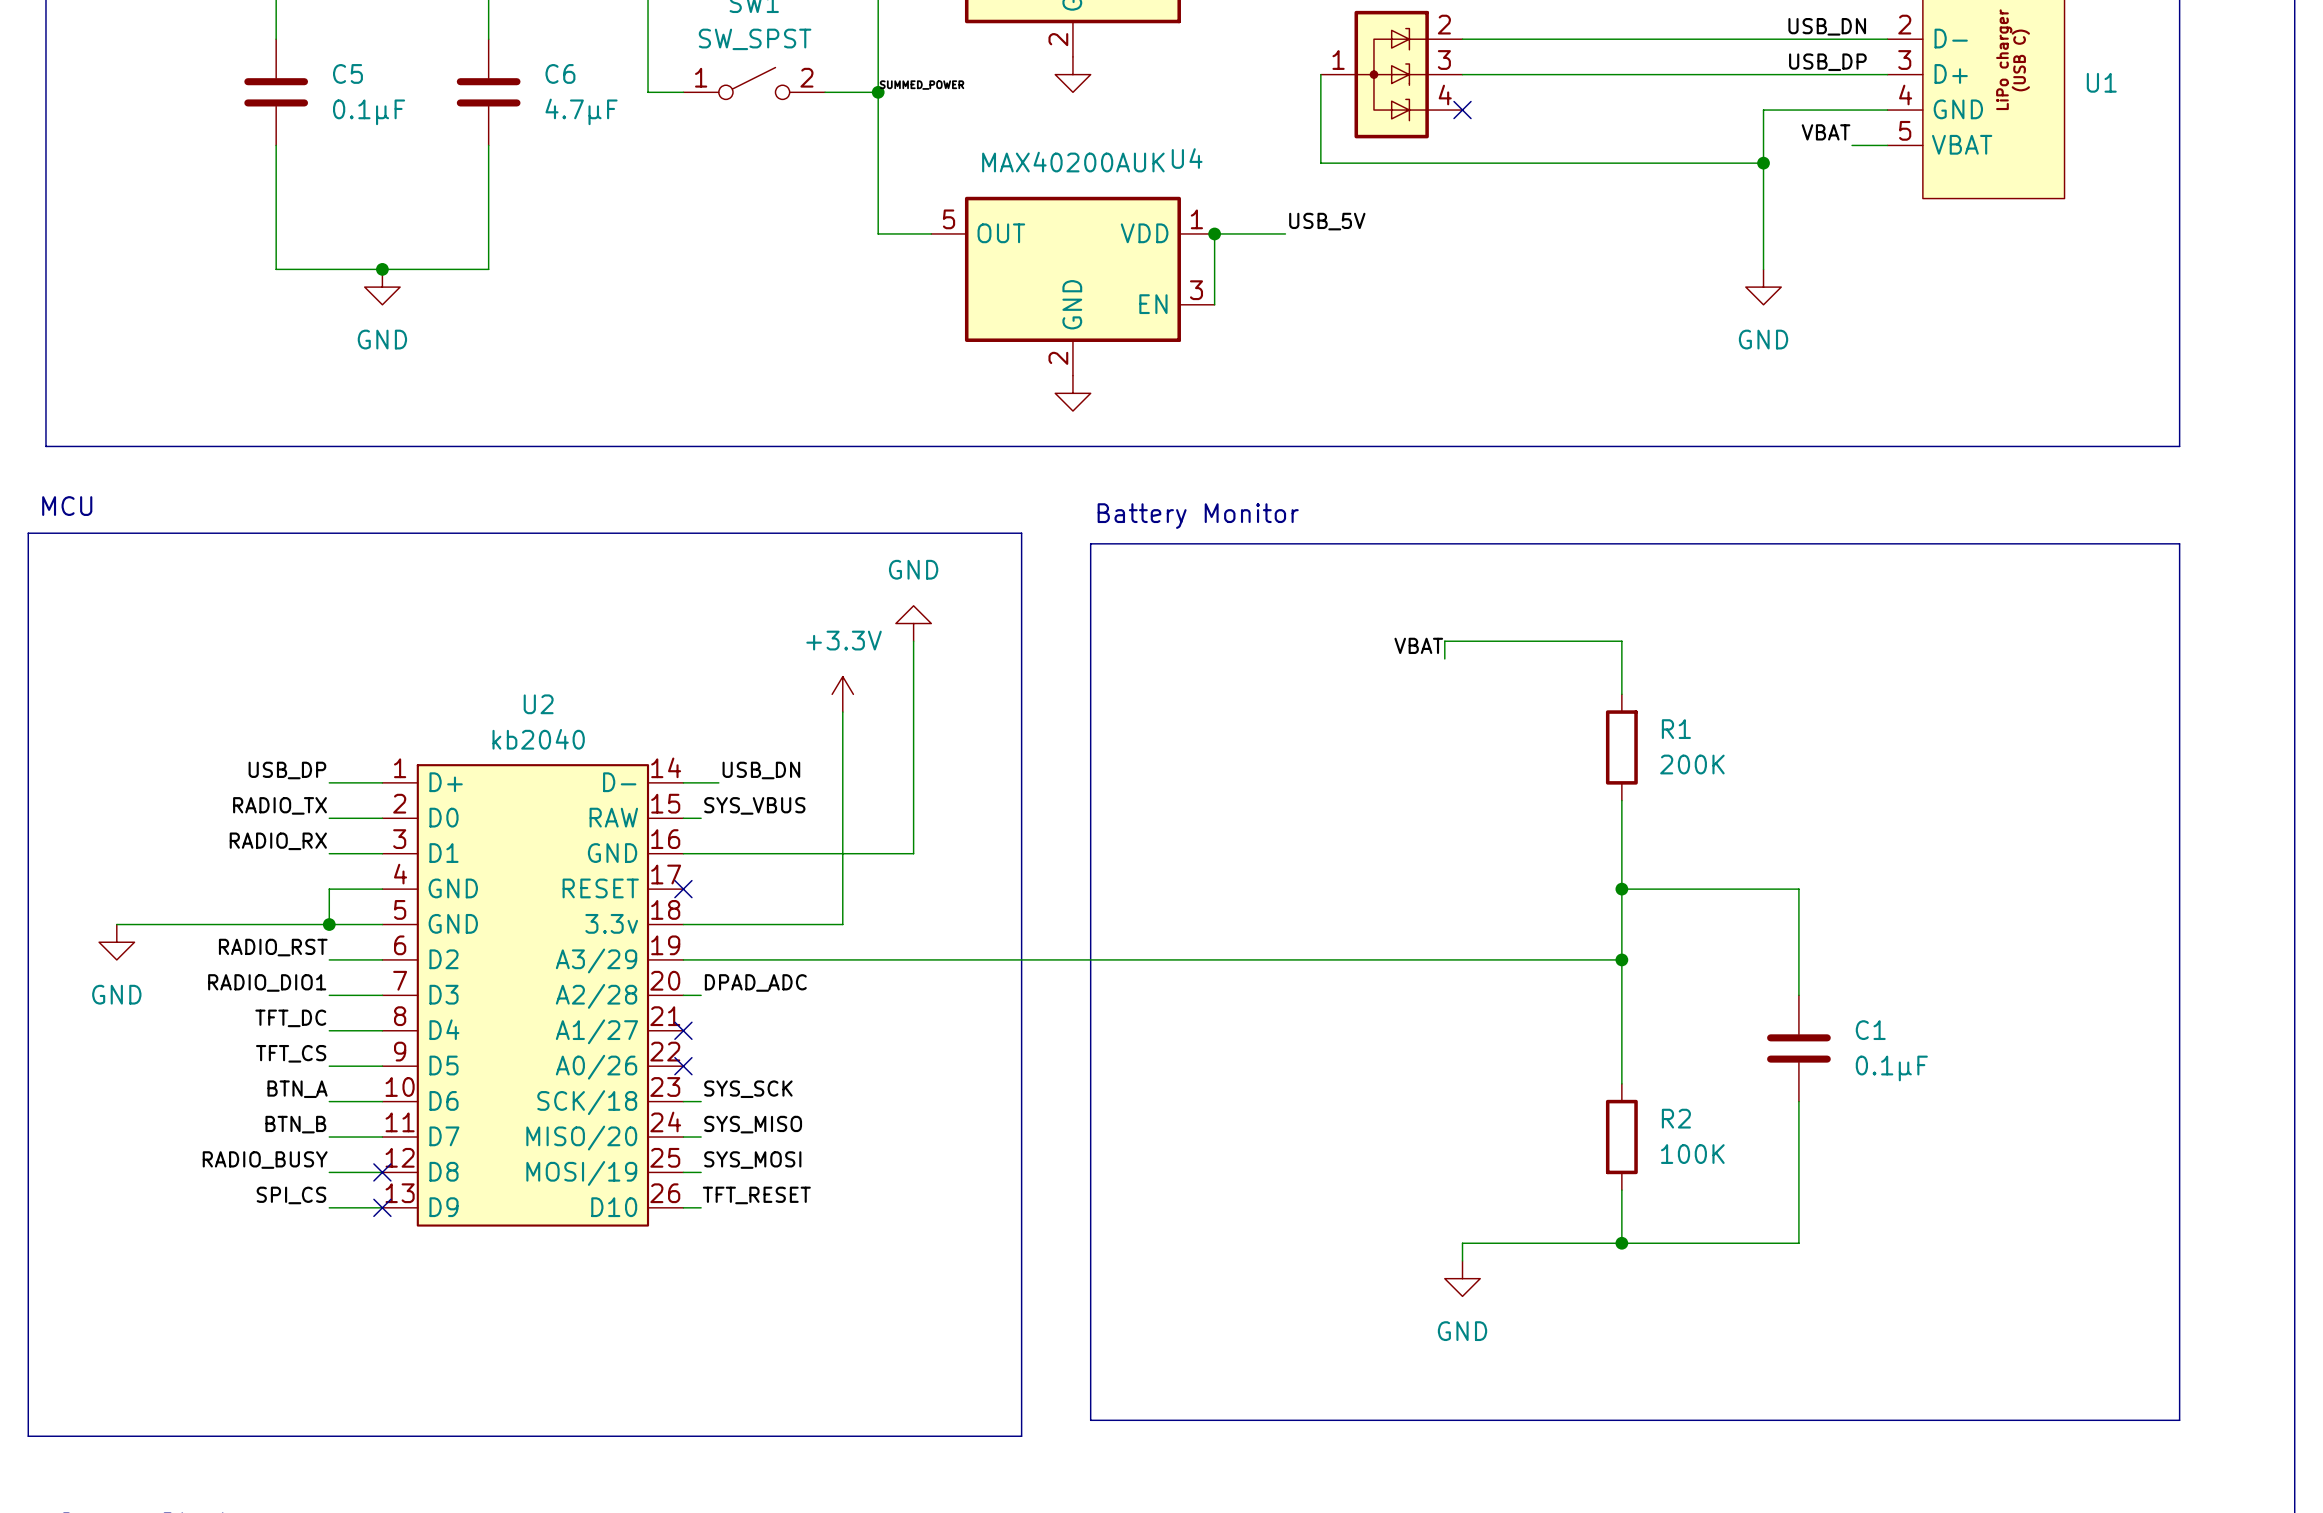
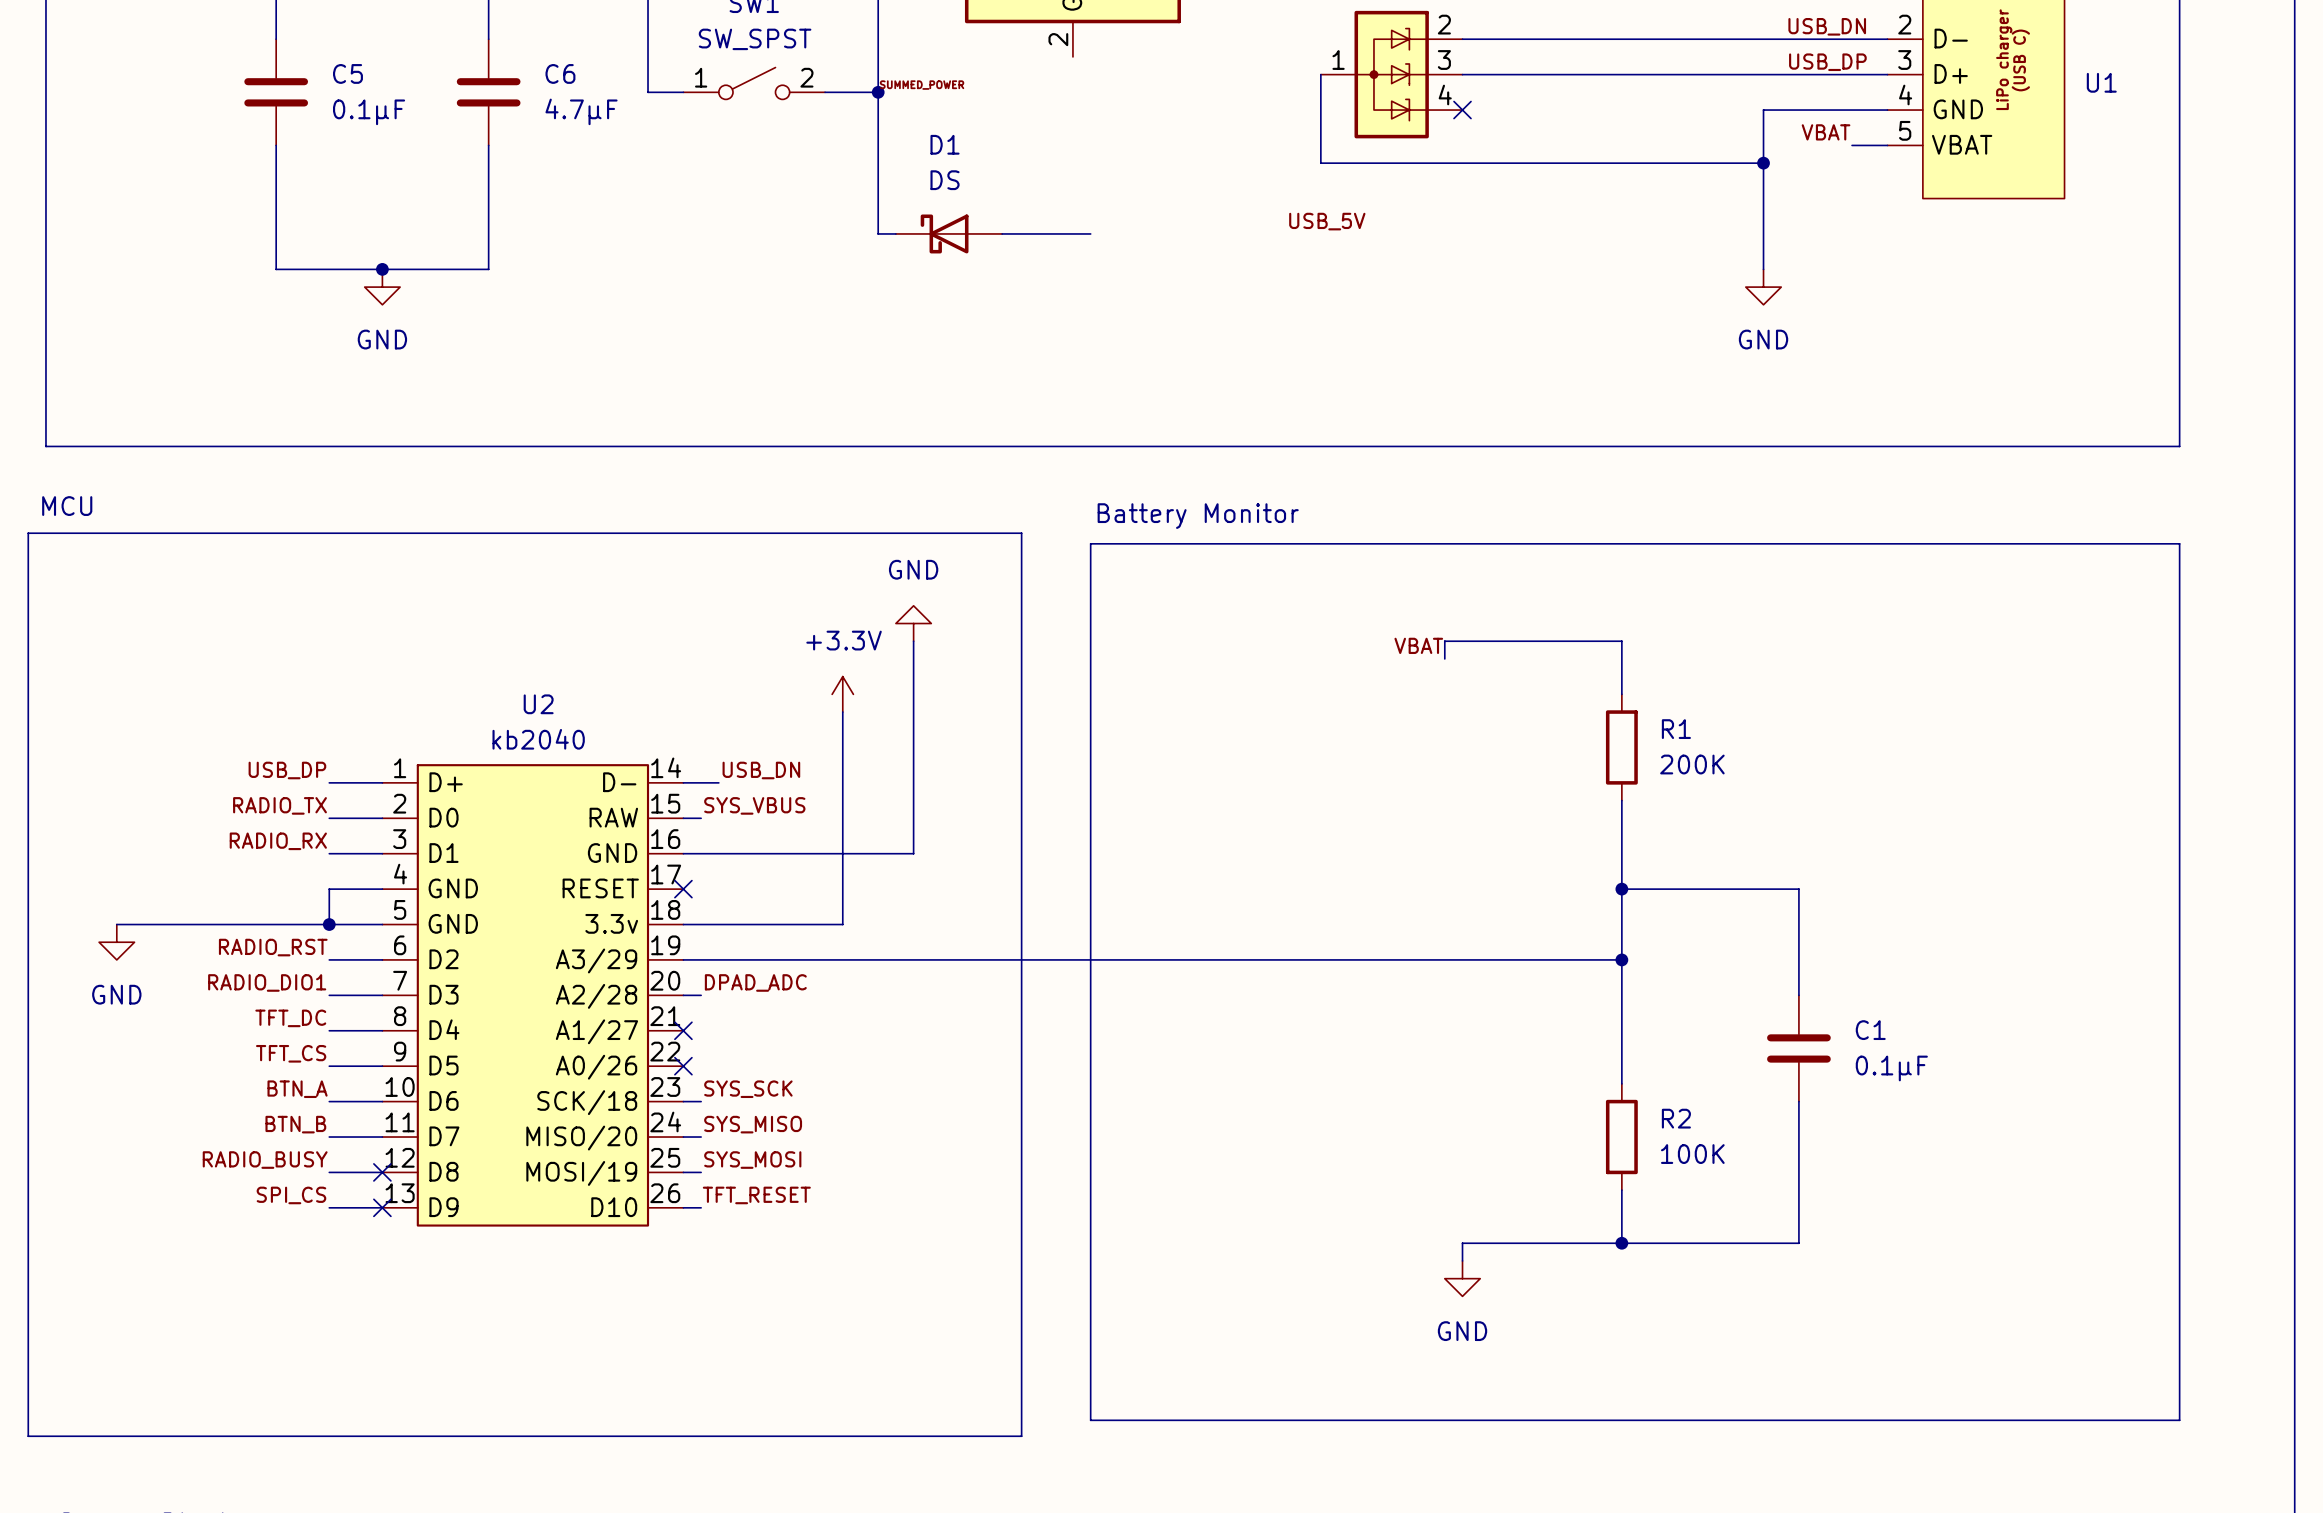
power symbol: (1072, 74) -> none
D1: none -> DS (949, 233)
junction: (1214, 233) -> none
wire: (1285, 233) (1214, 233) (1214, 304) -> none
U4: MAX40200AUK (1072, 286) -> none
power symbol: (1072, 393) -> none

